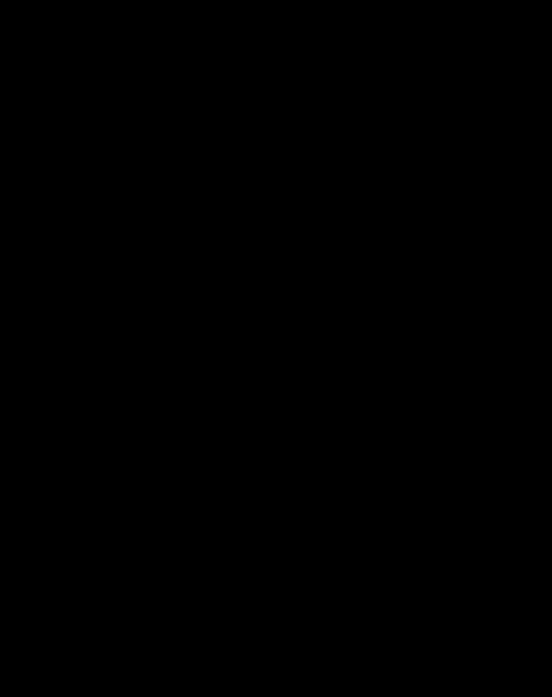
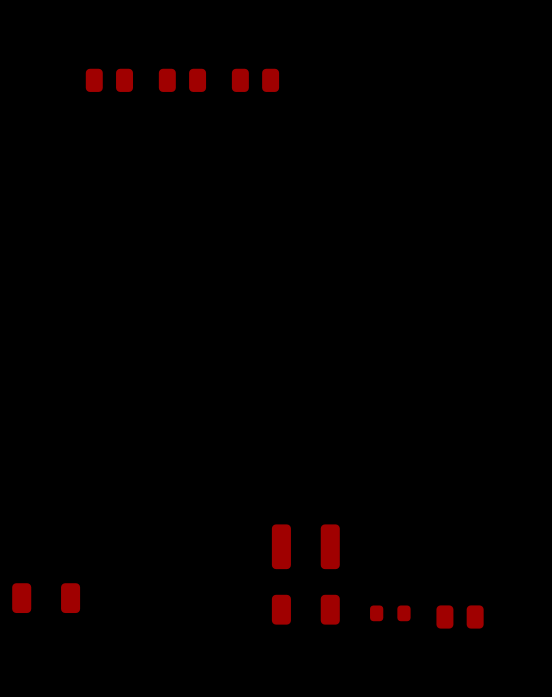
part: none -> (109, 80)
part: none -> (182, 80)
part: none -> (255, 80)
part: none -> (305, 546)
part: none -> (46, 598)
part: none -> (305, 609)
part: none -> (390, 613)
part: none -> (460, 617)

